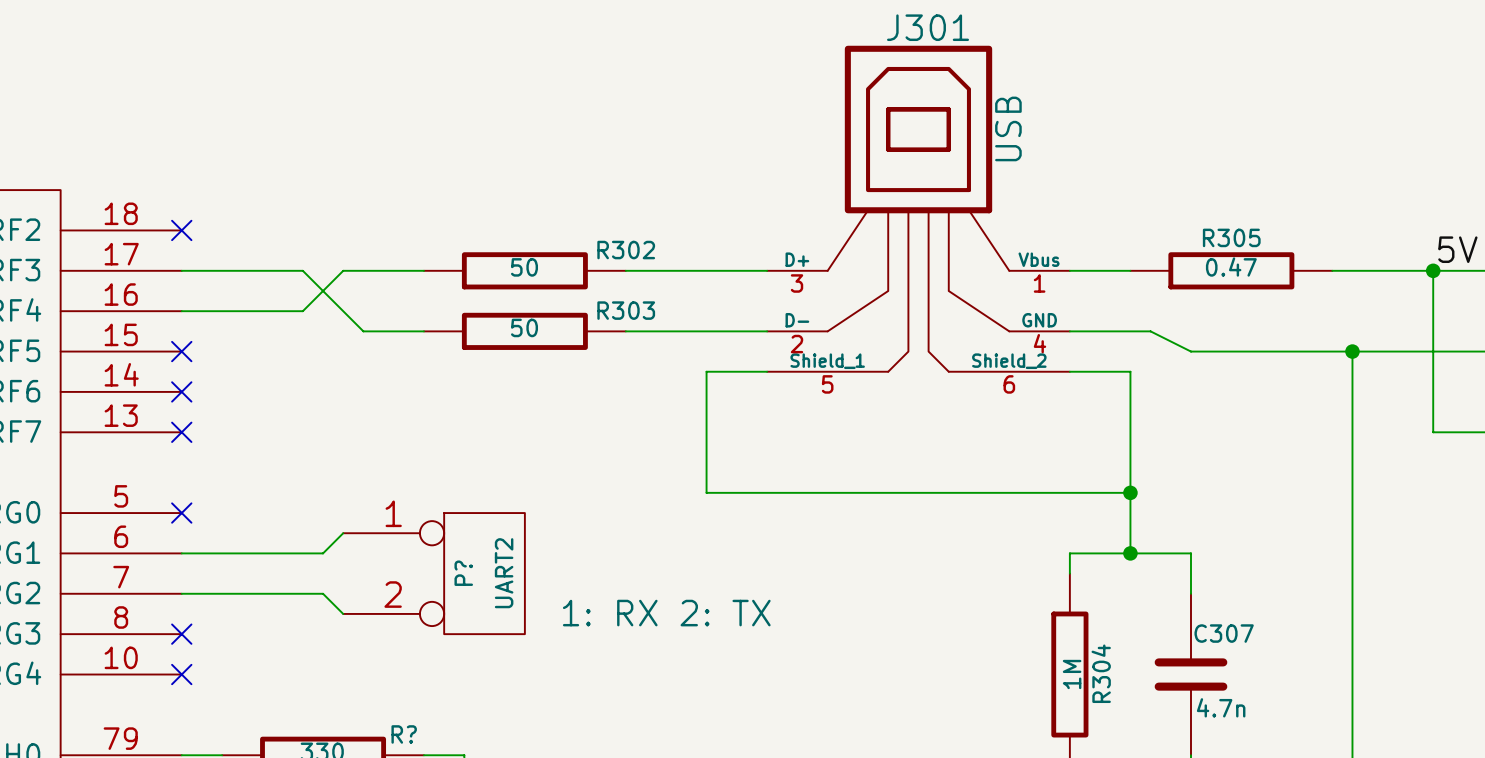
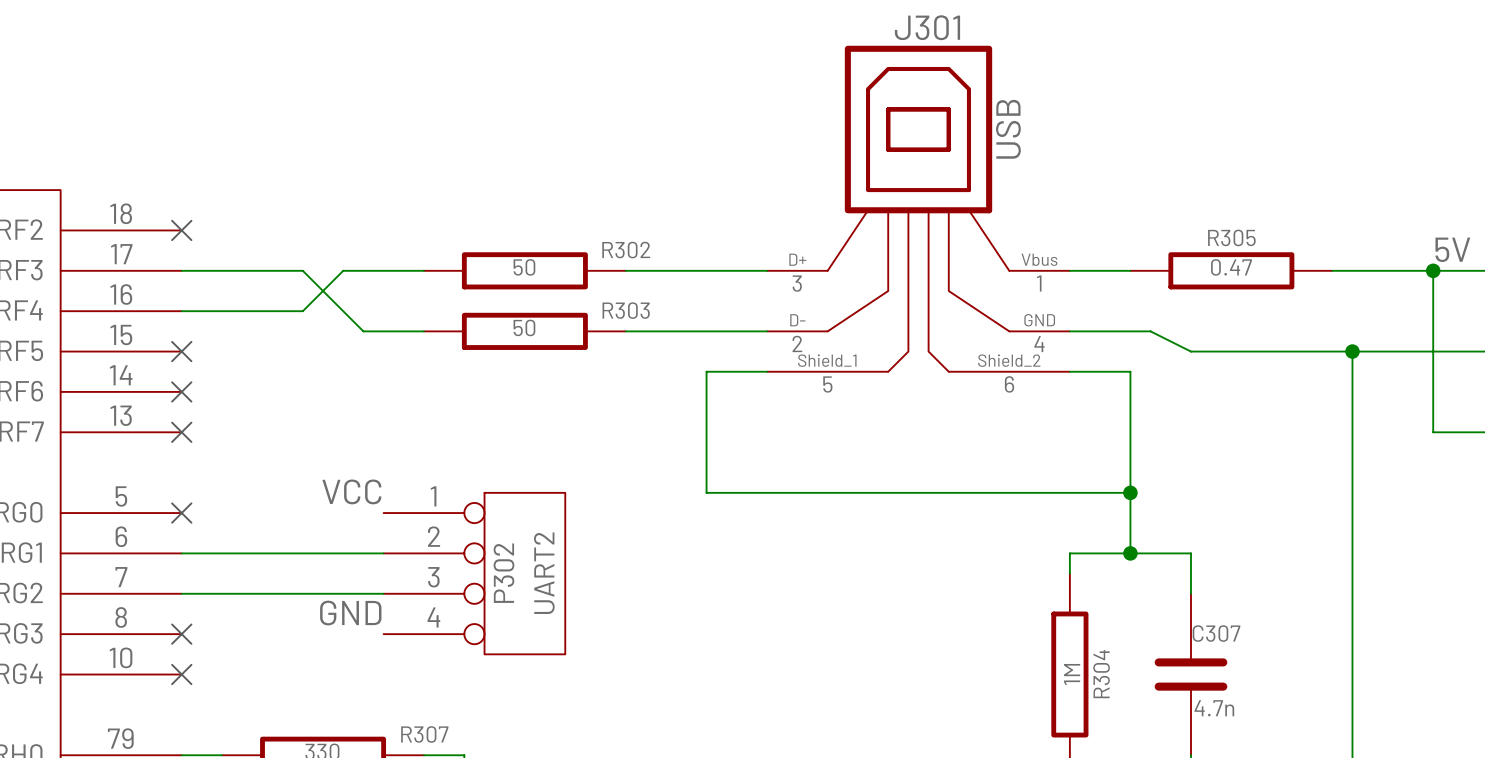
label: none -> VCC (351, 491)
wire: (343, 533) (323, 553) -> (383, 553) (323, 553)
P?: UART2 (434, 573) -> none
P302: none -> UART2 (474, 573)
wire: (323, 593) (343, 613) -> (323, 593) (383, 593)
label: none -> GND (350, 613)
R? name: R? (404, 734) -> R307 (424, 734)

